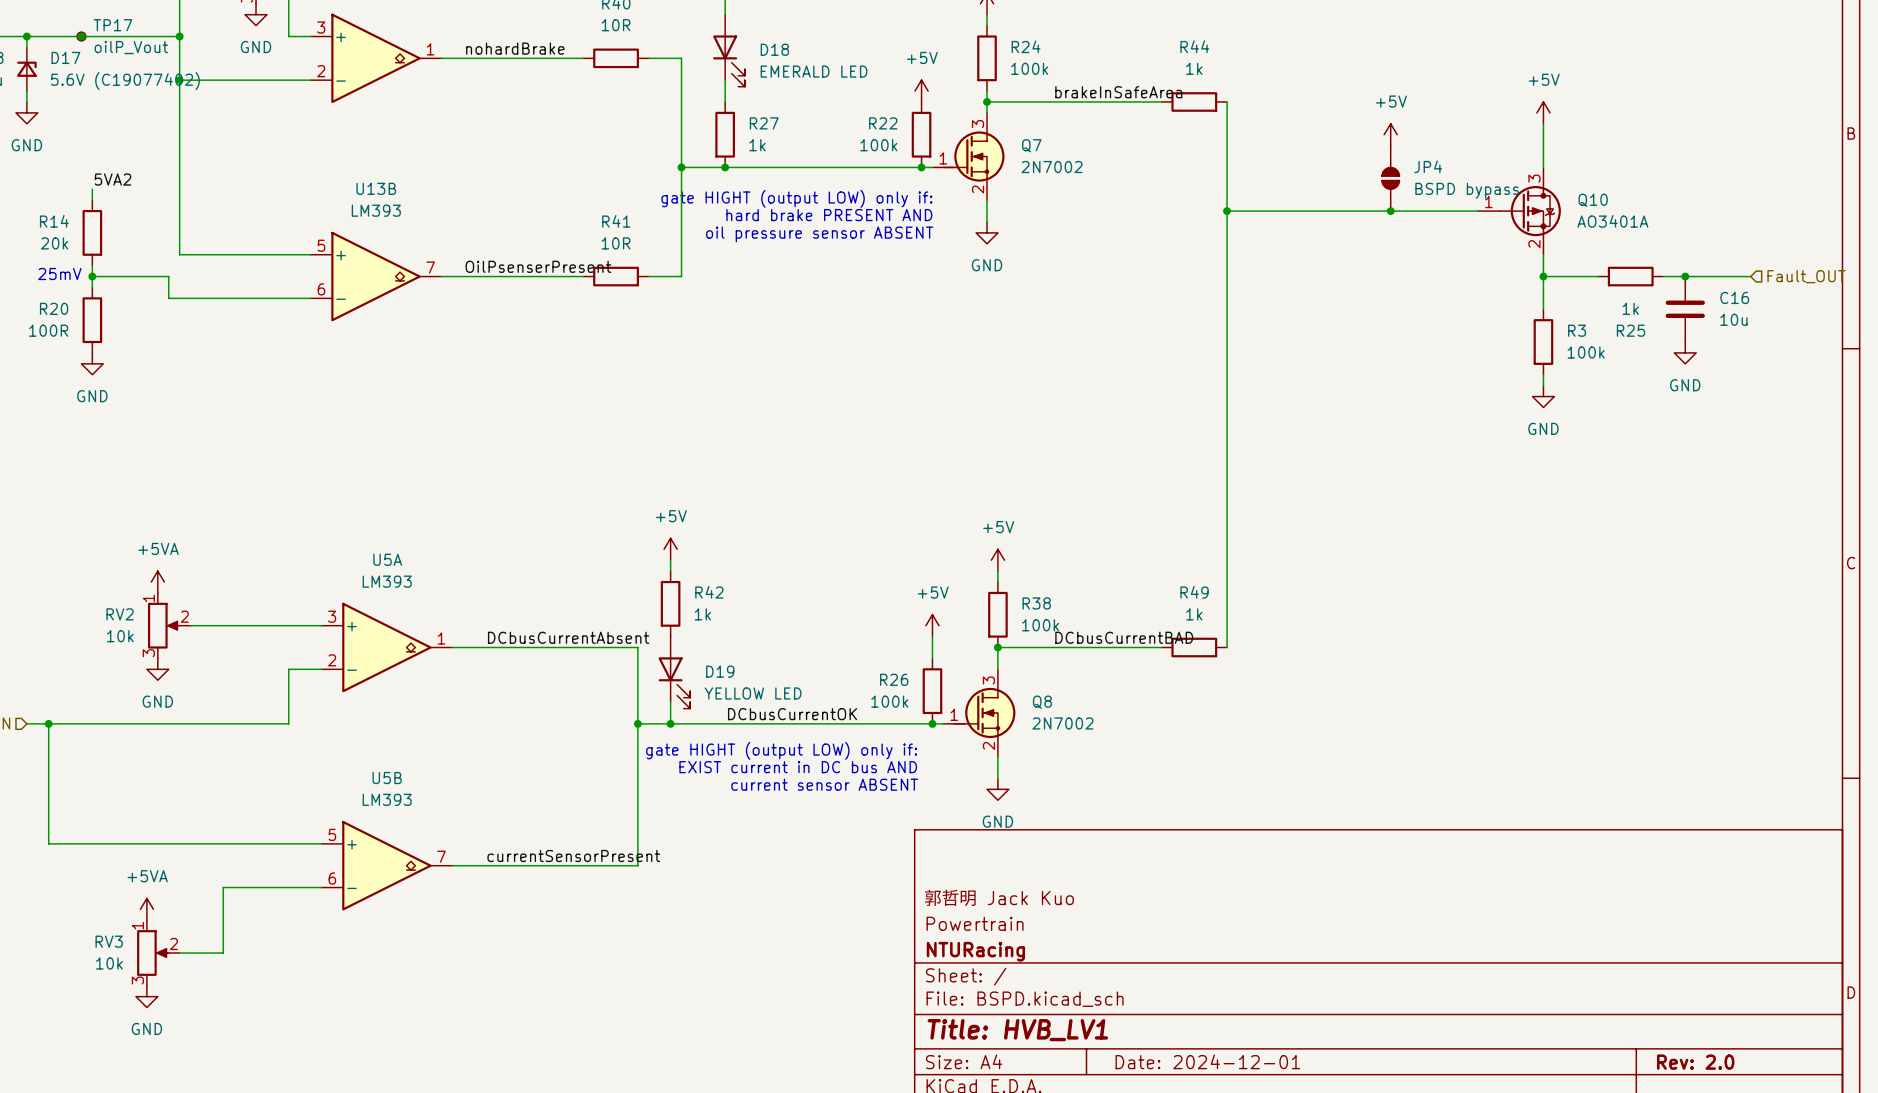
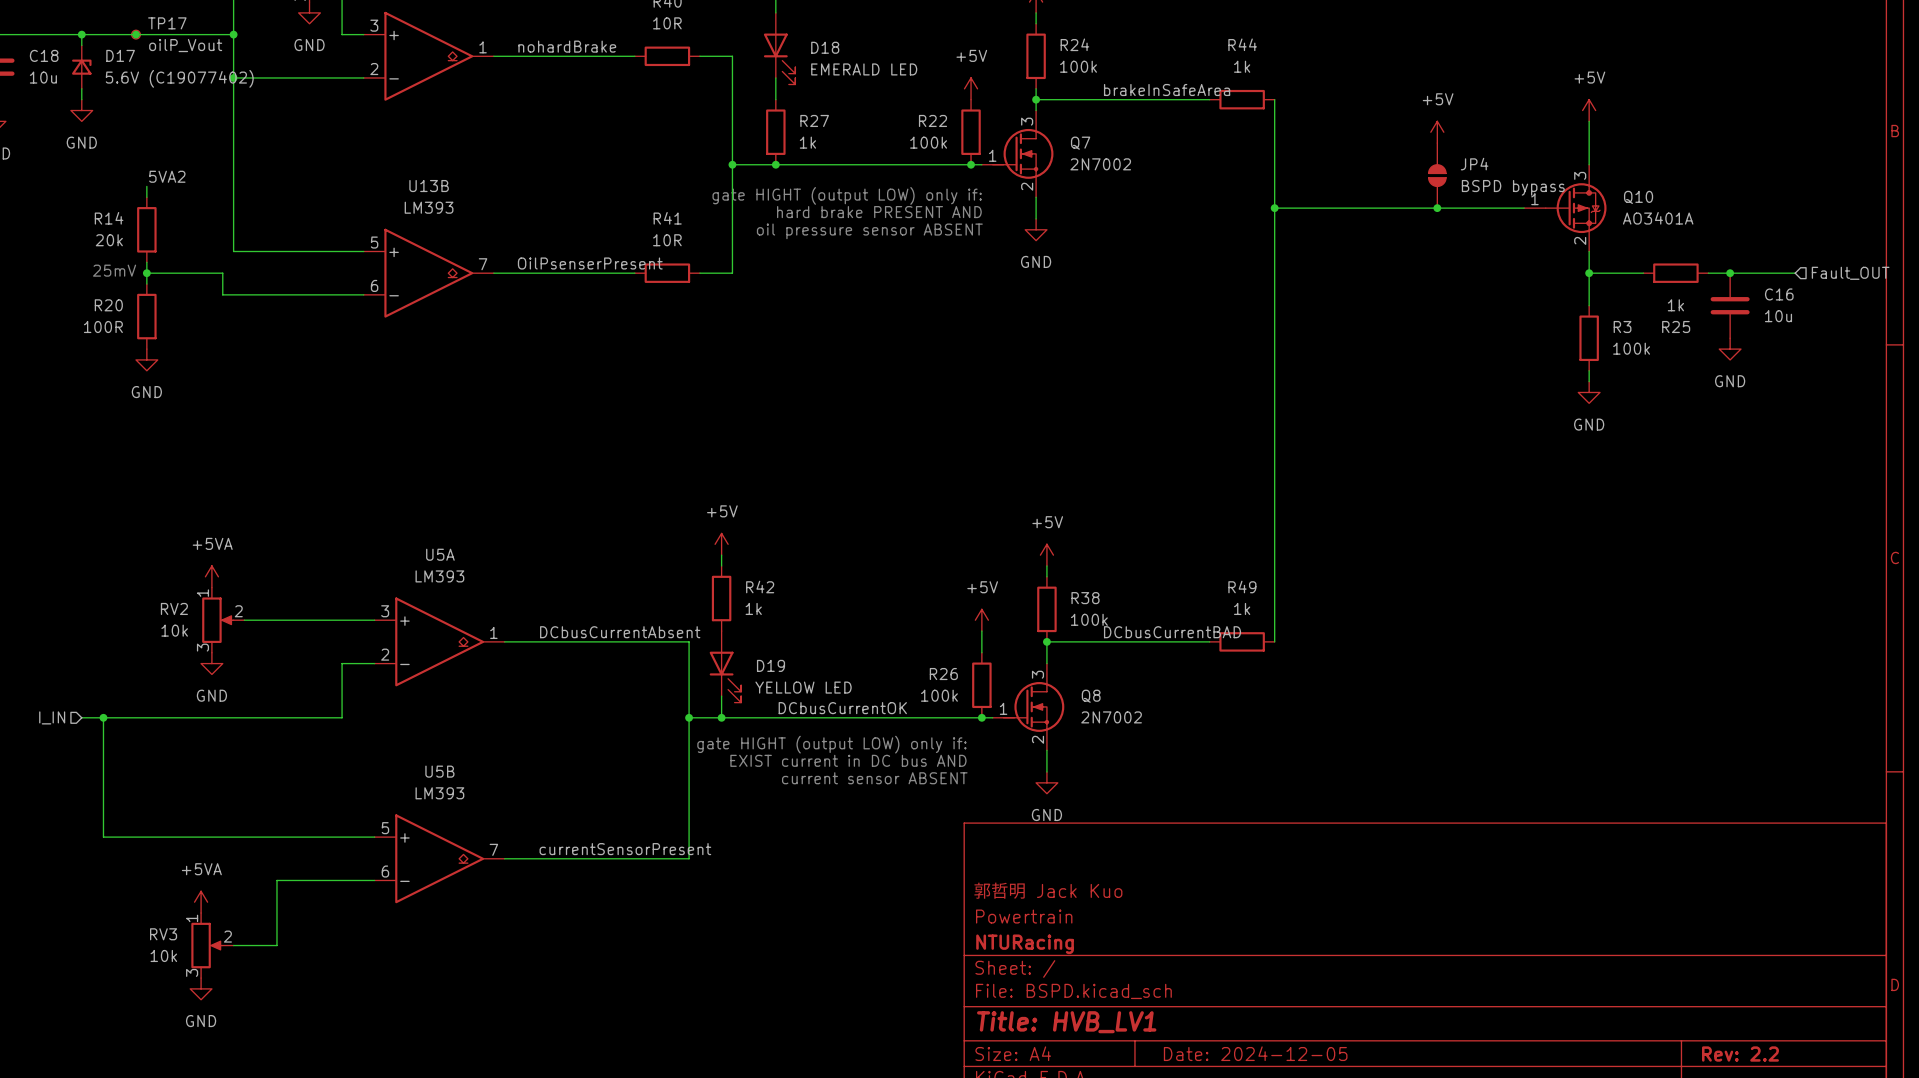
title block: Date: 2024-12-01 (1207, 1061) -> Date: 2024-12-05 (1255, 1053)
title block: Rev: 2.0 (1695, 1062) -> Rev: 2.2 (1740, 1054)

